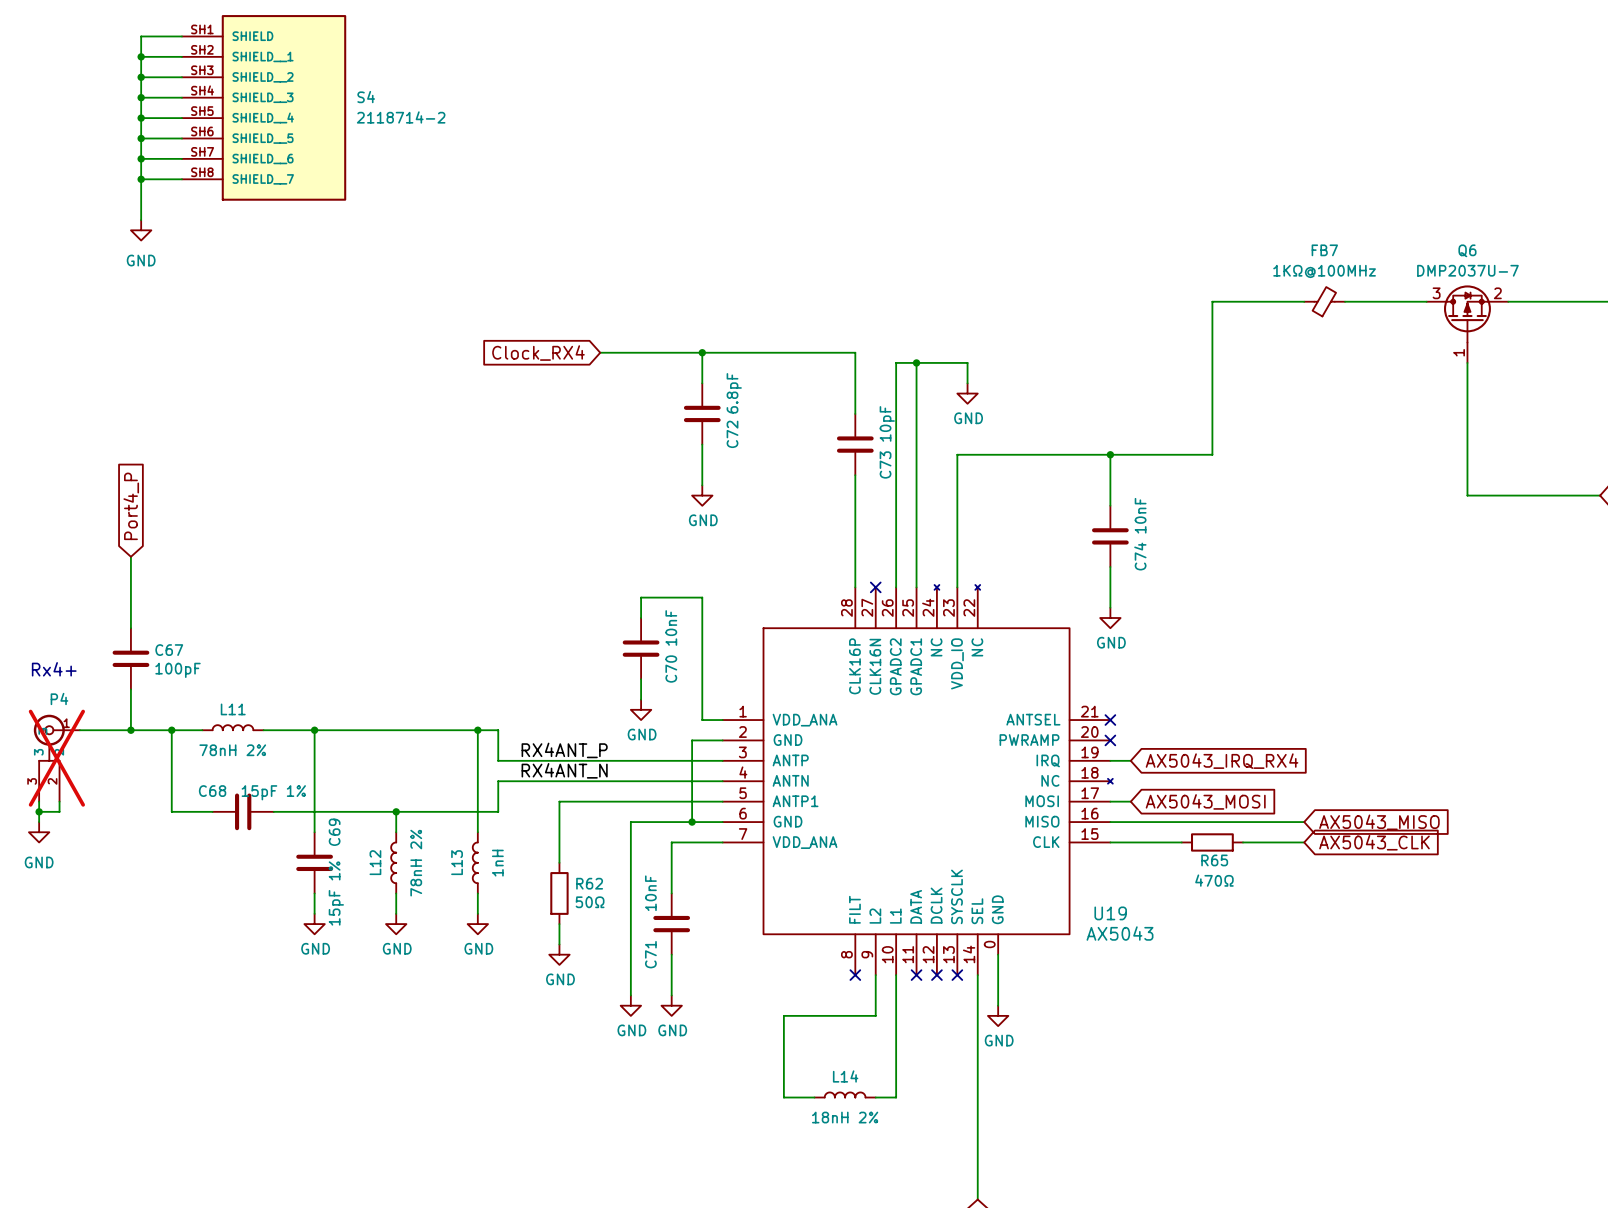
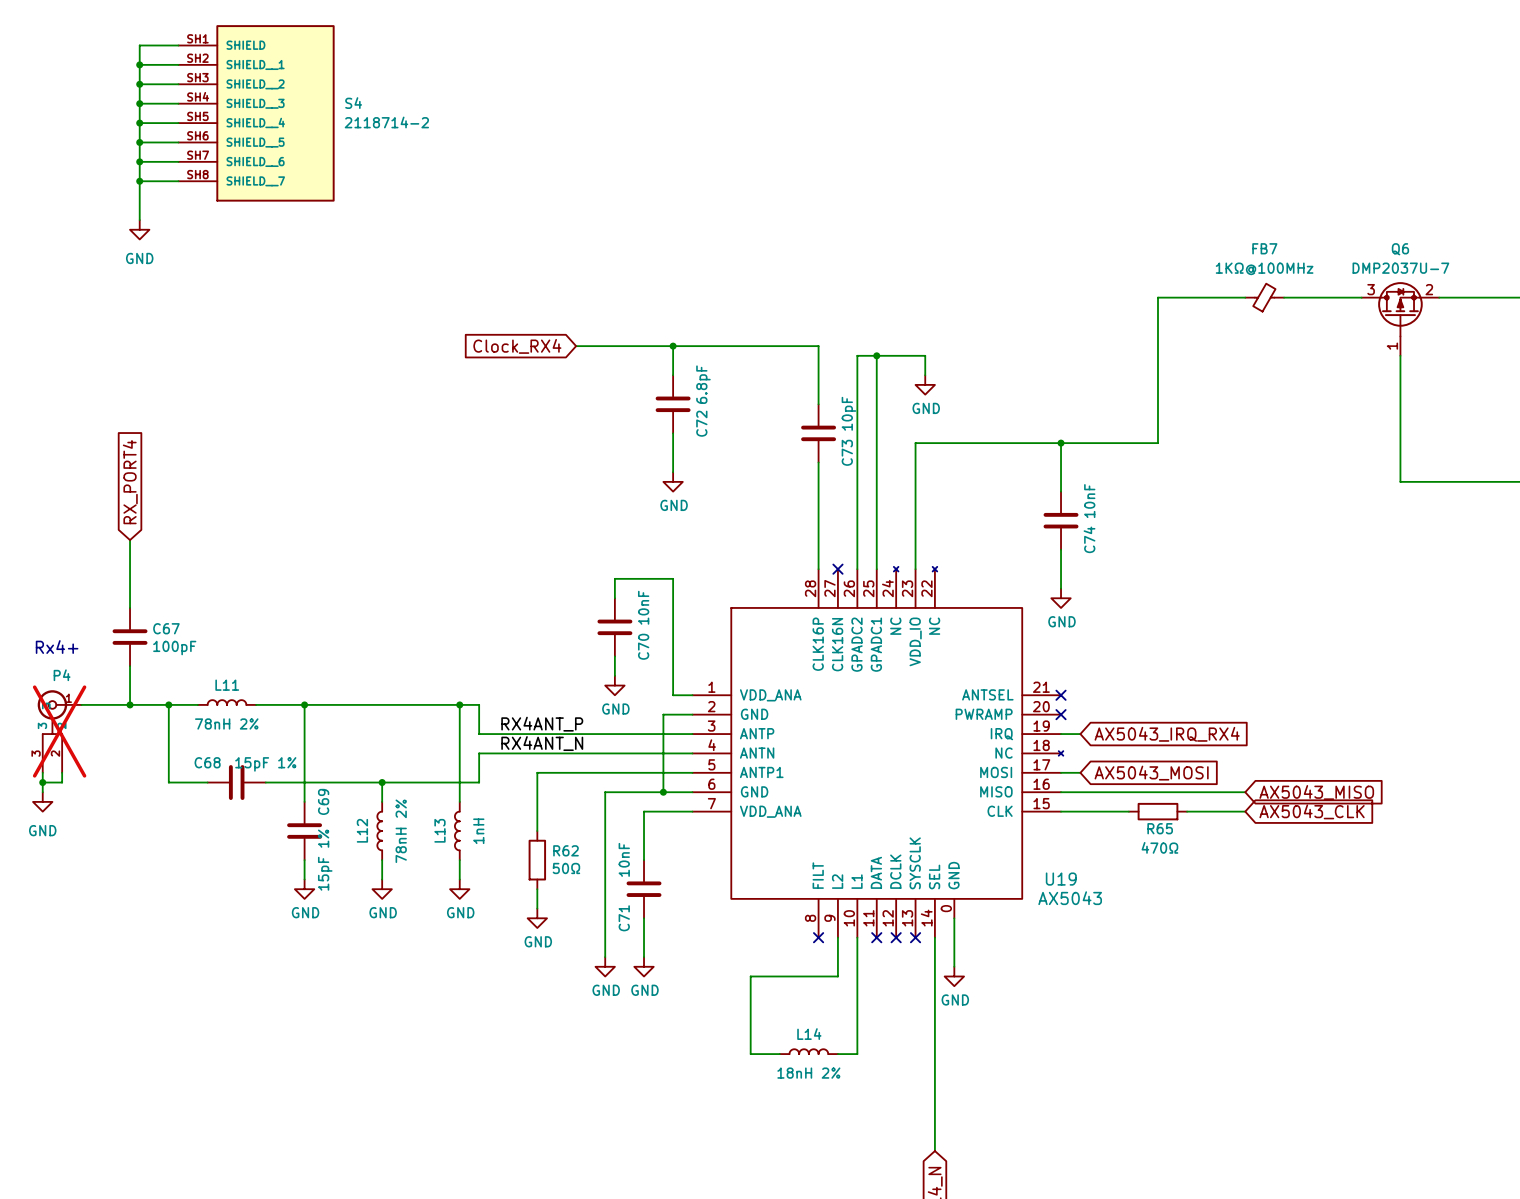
global label: Port4_P (131, 506) -> RX_PORT4 (130, 482)

